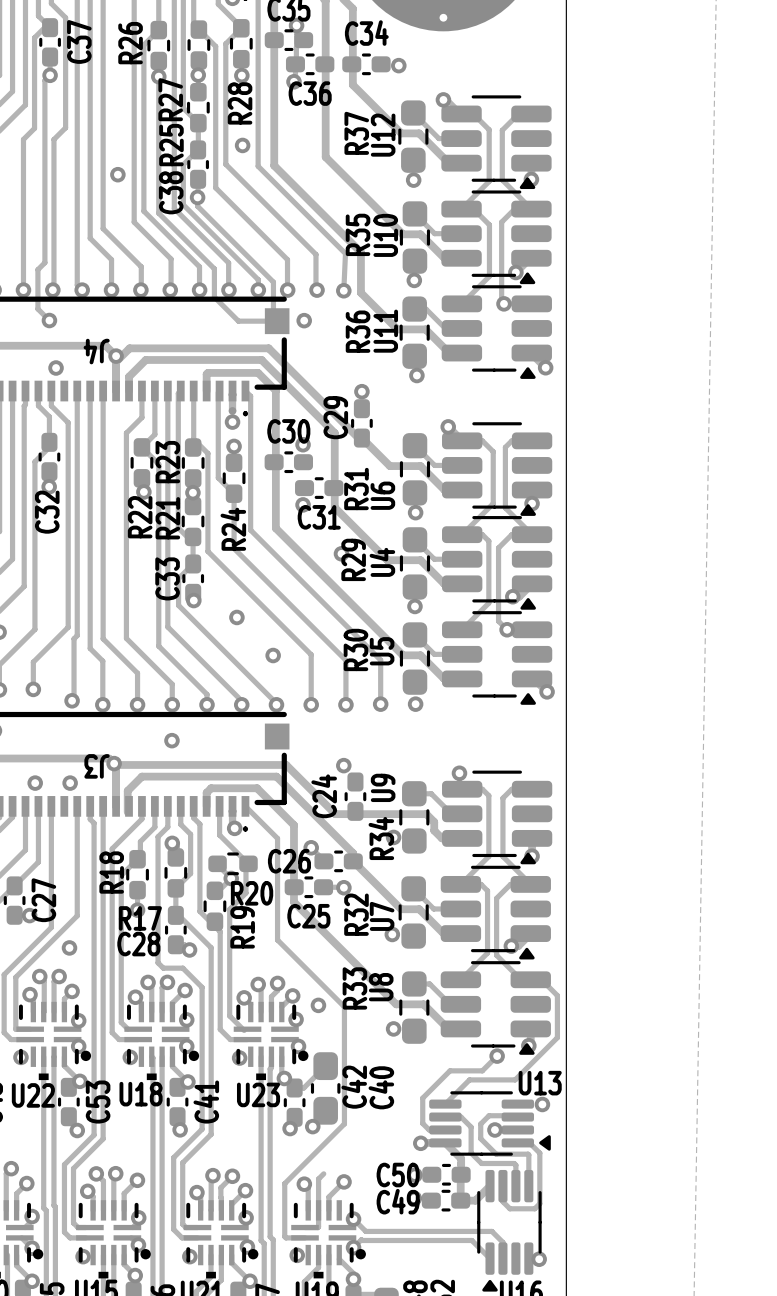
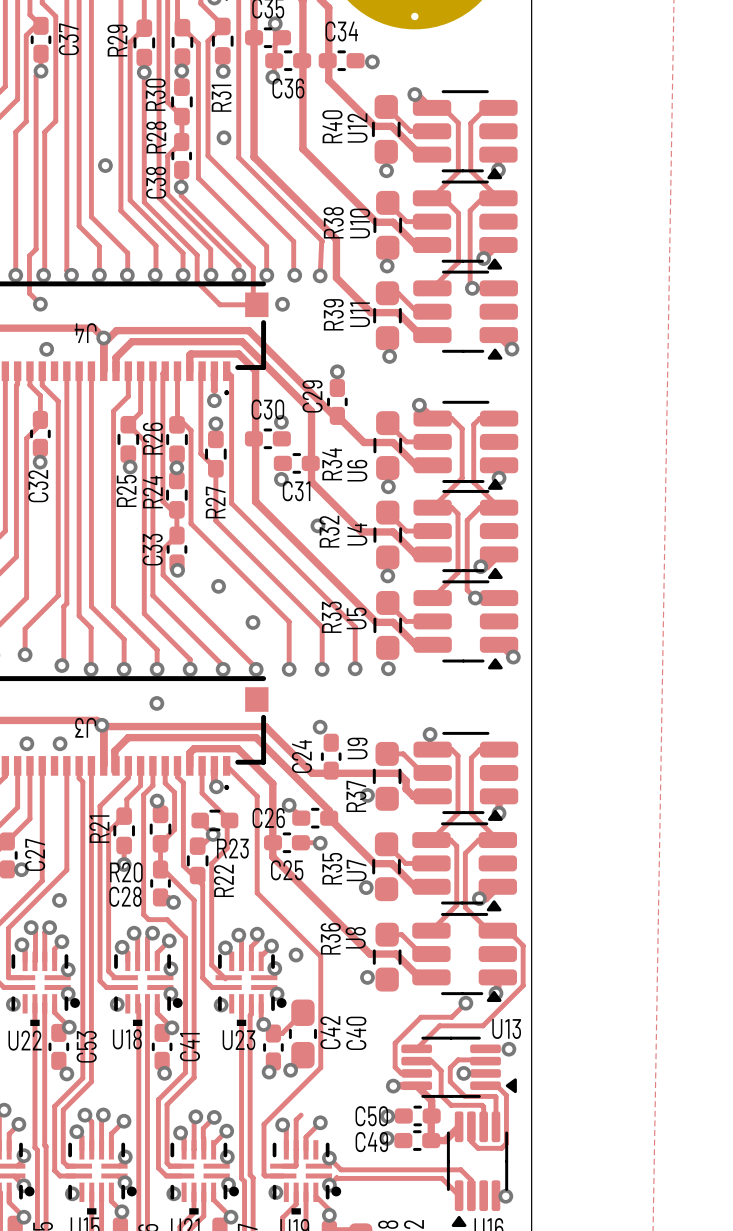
R26 name: R26 (130, 43) -> R29 (117, 40)
R27 name: R27 (170, 99) -> R30 (155, 94)
R28 name: R28 (240, 103) -> R31 (221, 98)
R37 name: R37 (356, 133) -> R40 (332, 126)
R25 name: R25 (171, 145) -> R28 (156, 137)
R35 name: R35 (358, 234) -> R38 (333, 222)
R36 name: R36 (358, 331) -> R39 (333, 314)
R23 name: R23 (167, 462) -> R26 (152, 438)
R31 name: R31 (356, 489) -> R34 (332, 464)
R22 name: R22 (140, 517) -> R25 (126, 490)
R21 name: R21 (167, 518) -> R24 (152, 492)
R24 name: R24 (233, 529) -> R27 (215, 502)
R29 name: R29 (353, 559) -> R32 (329, 531)
R30 name: R30 (355, 649) -> R33 (331, 617)
R34 name: R34 (381, 838) -> R37 (356, 796)
R18 name: R18 (111, 872) -> R21 (99, 829)
R20 name: R20 (252, 893) -> R23 (232, 848)
R32 name: R32 (356, 914) -> R35 (332, 868)
R17 name: R17 (140, 918) -> R20 (126, 872)
R19 name: R19 (242, 927) -> R22 (223, 880)
R33 name: R33 (354, 988) -> R36 (330, 938)

